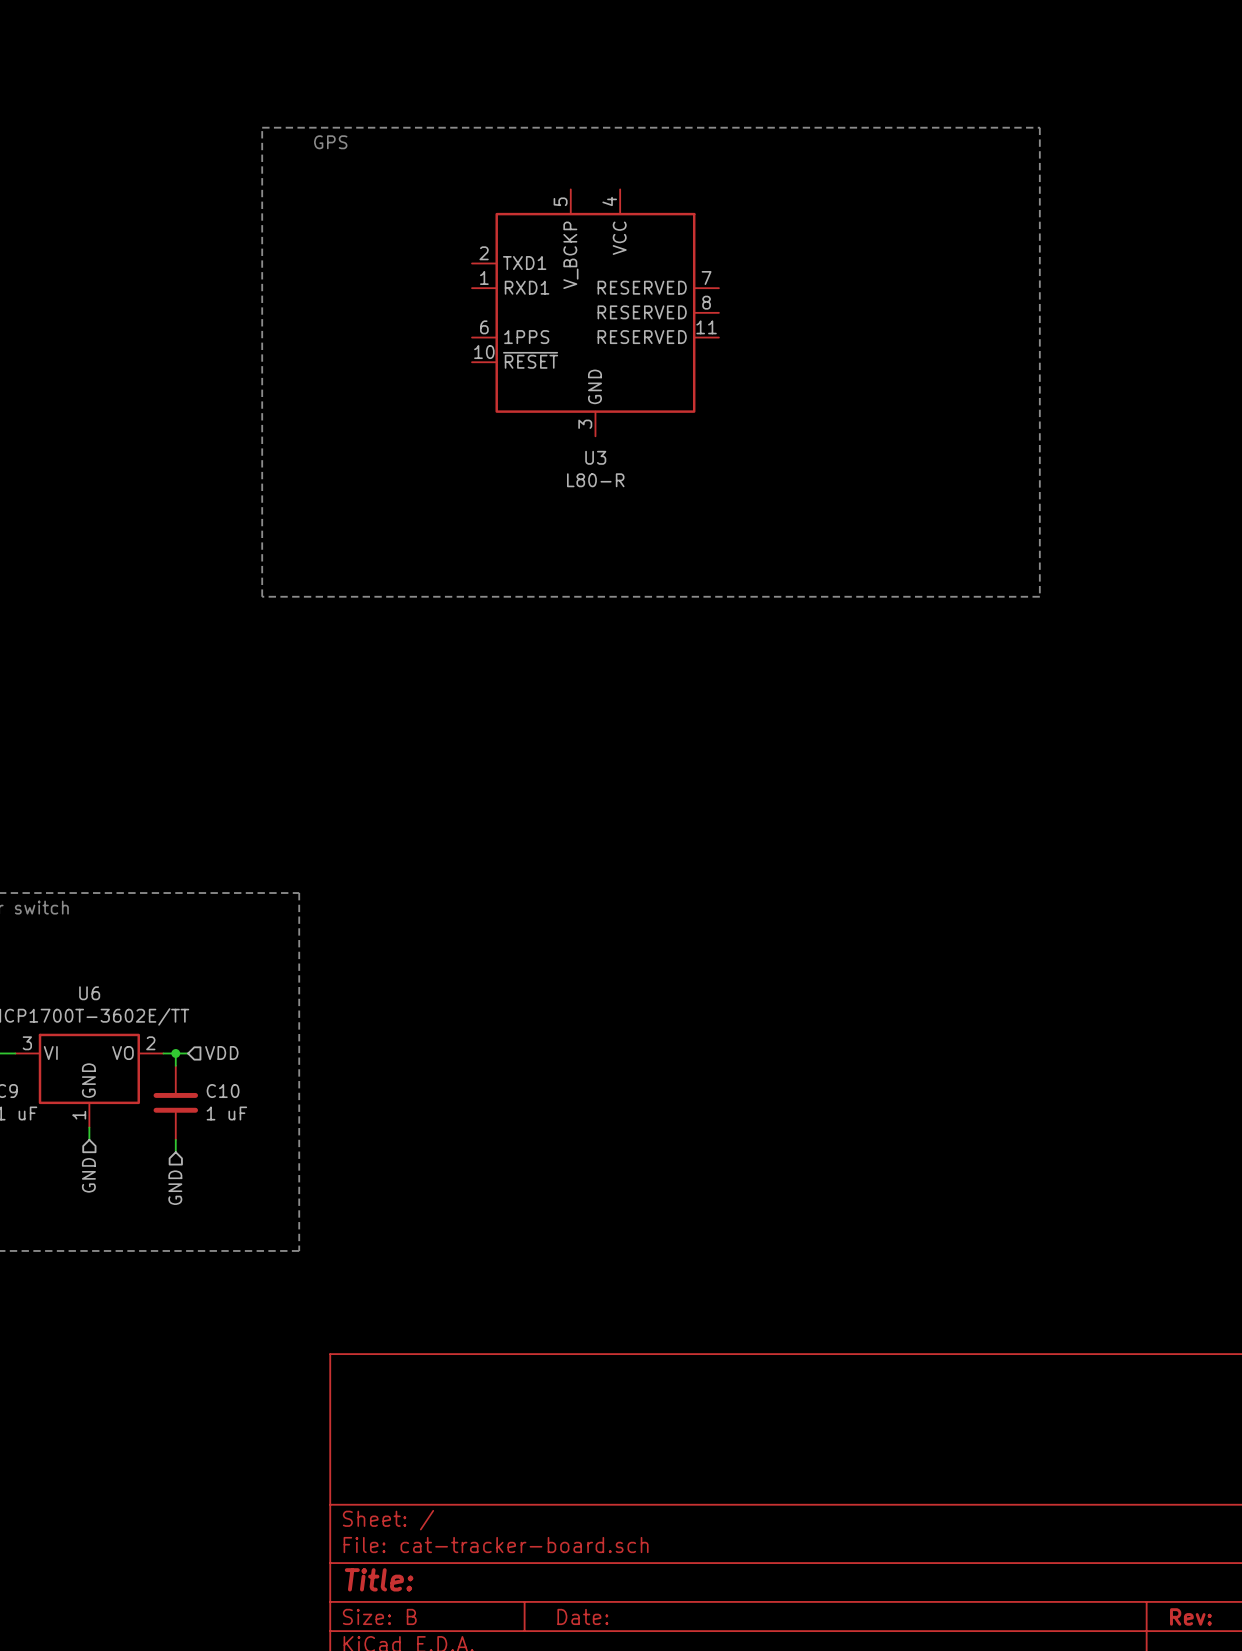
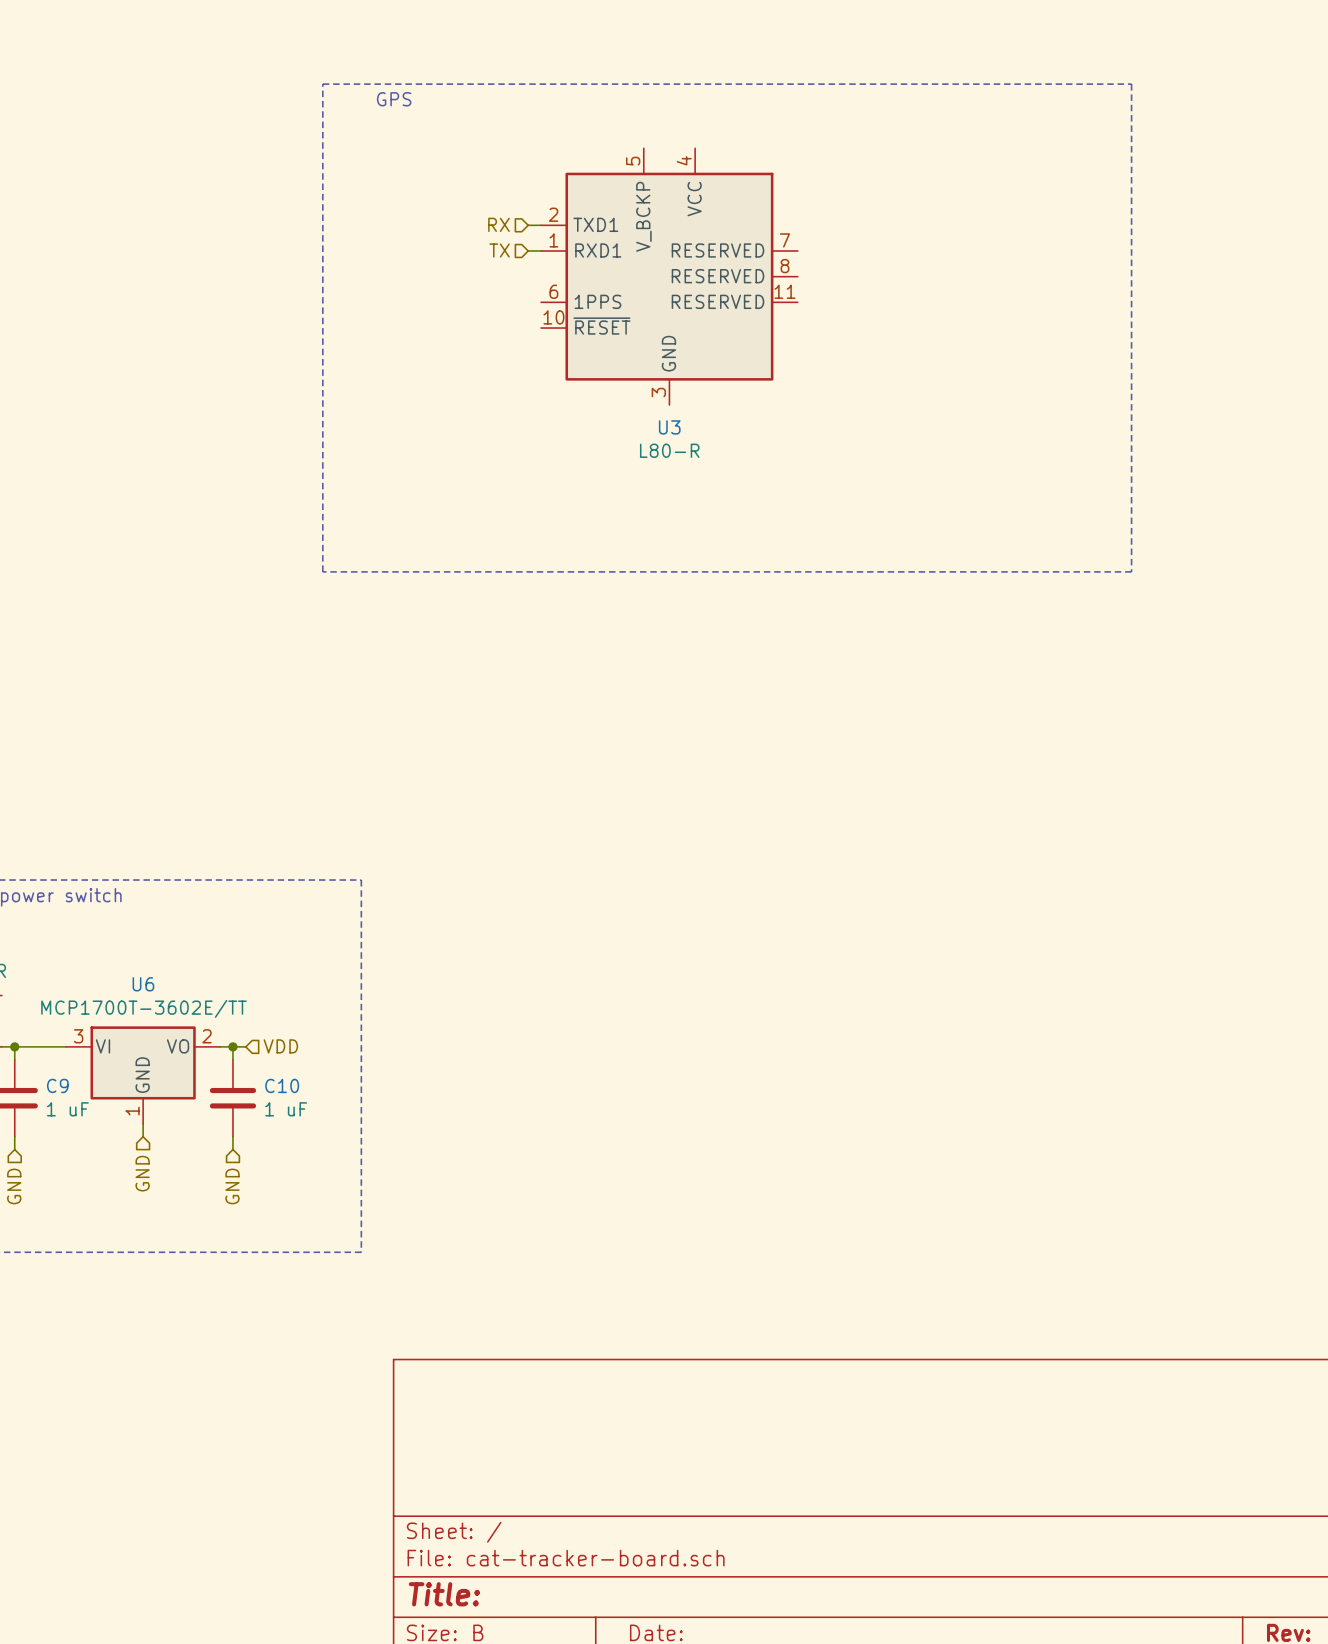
hierarchical label: none -> RX (498, 224)
wire: none -> (528, 225) (541, 225)
hierarchical label: none -> TX (499, 250)
wire: none -> (528, 250) (541, 250)

